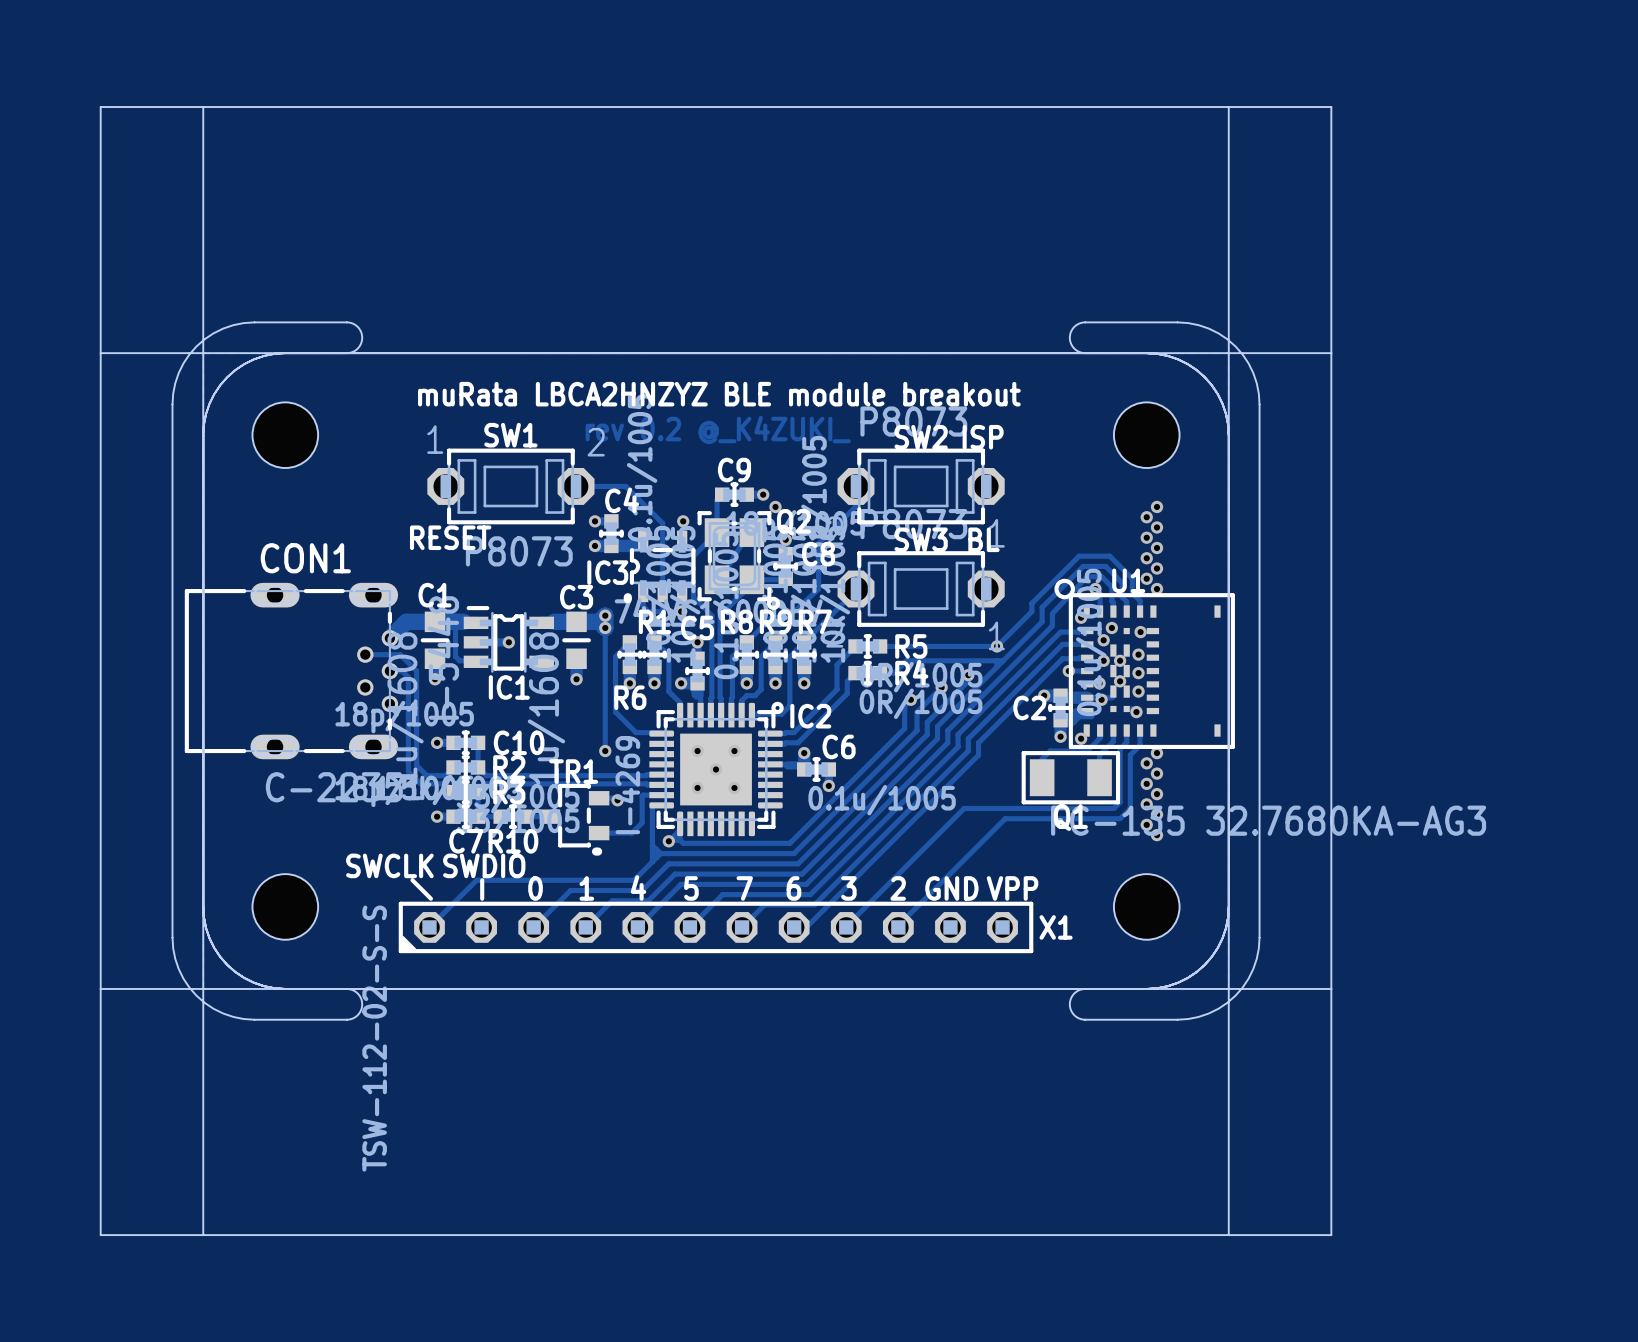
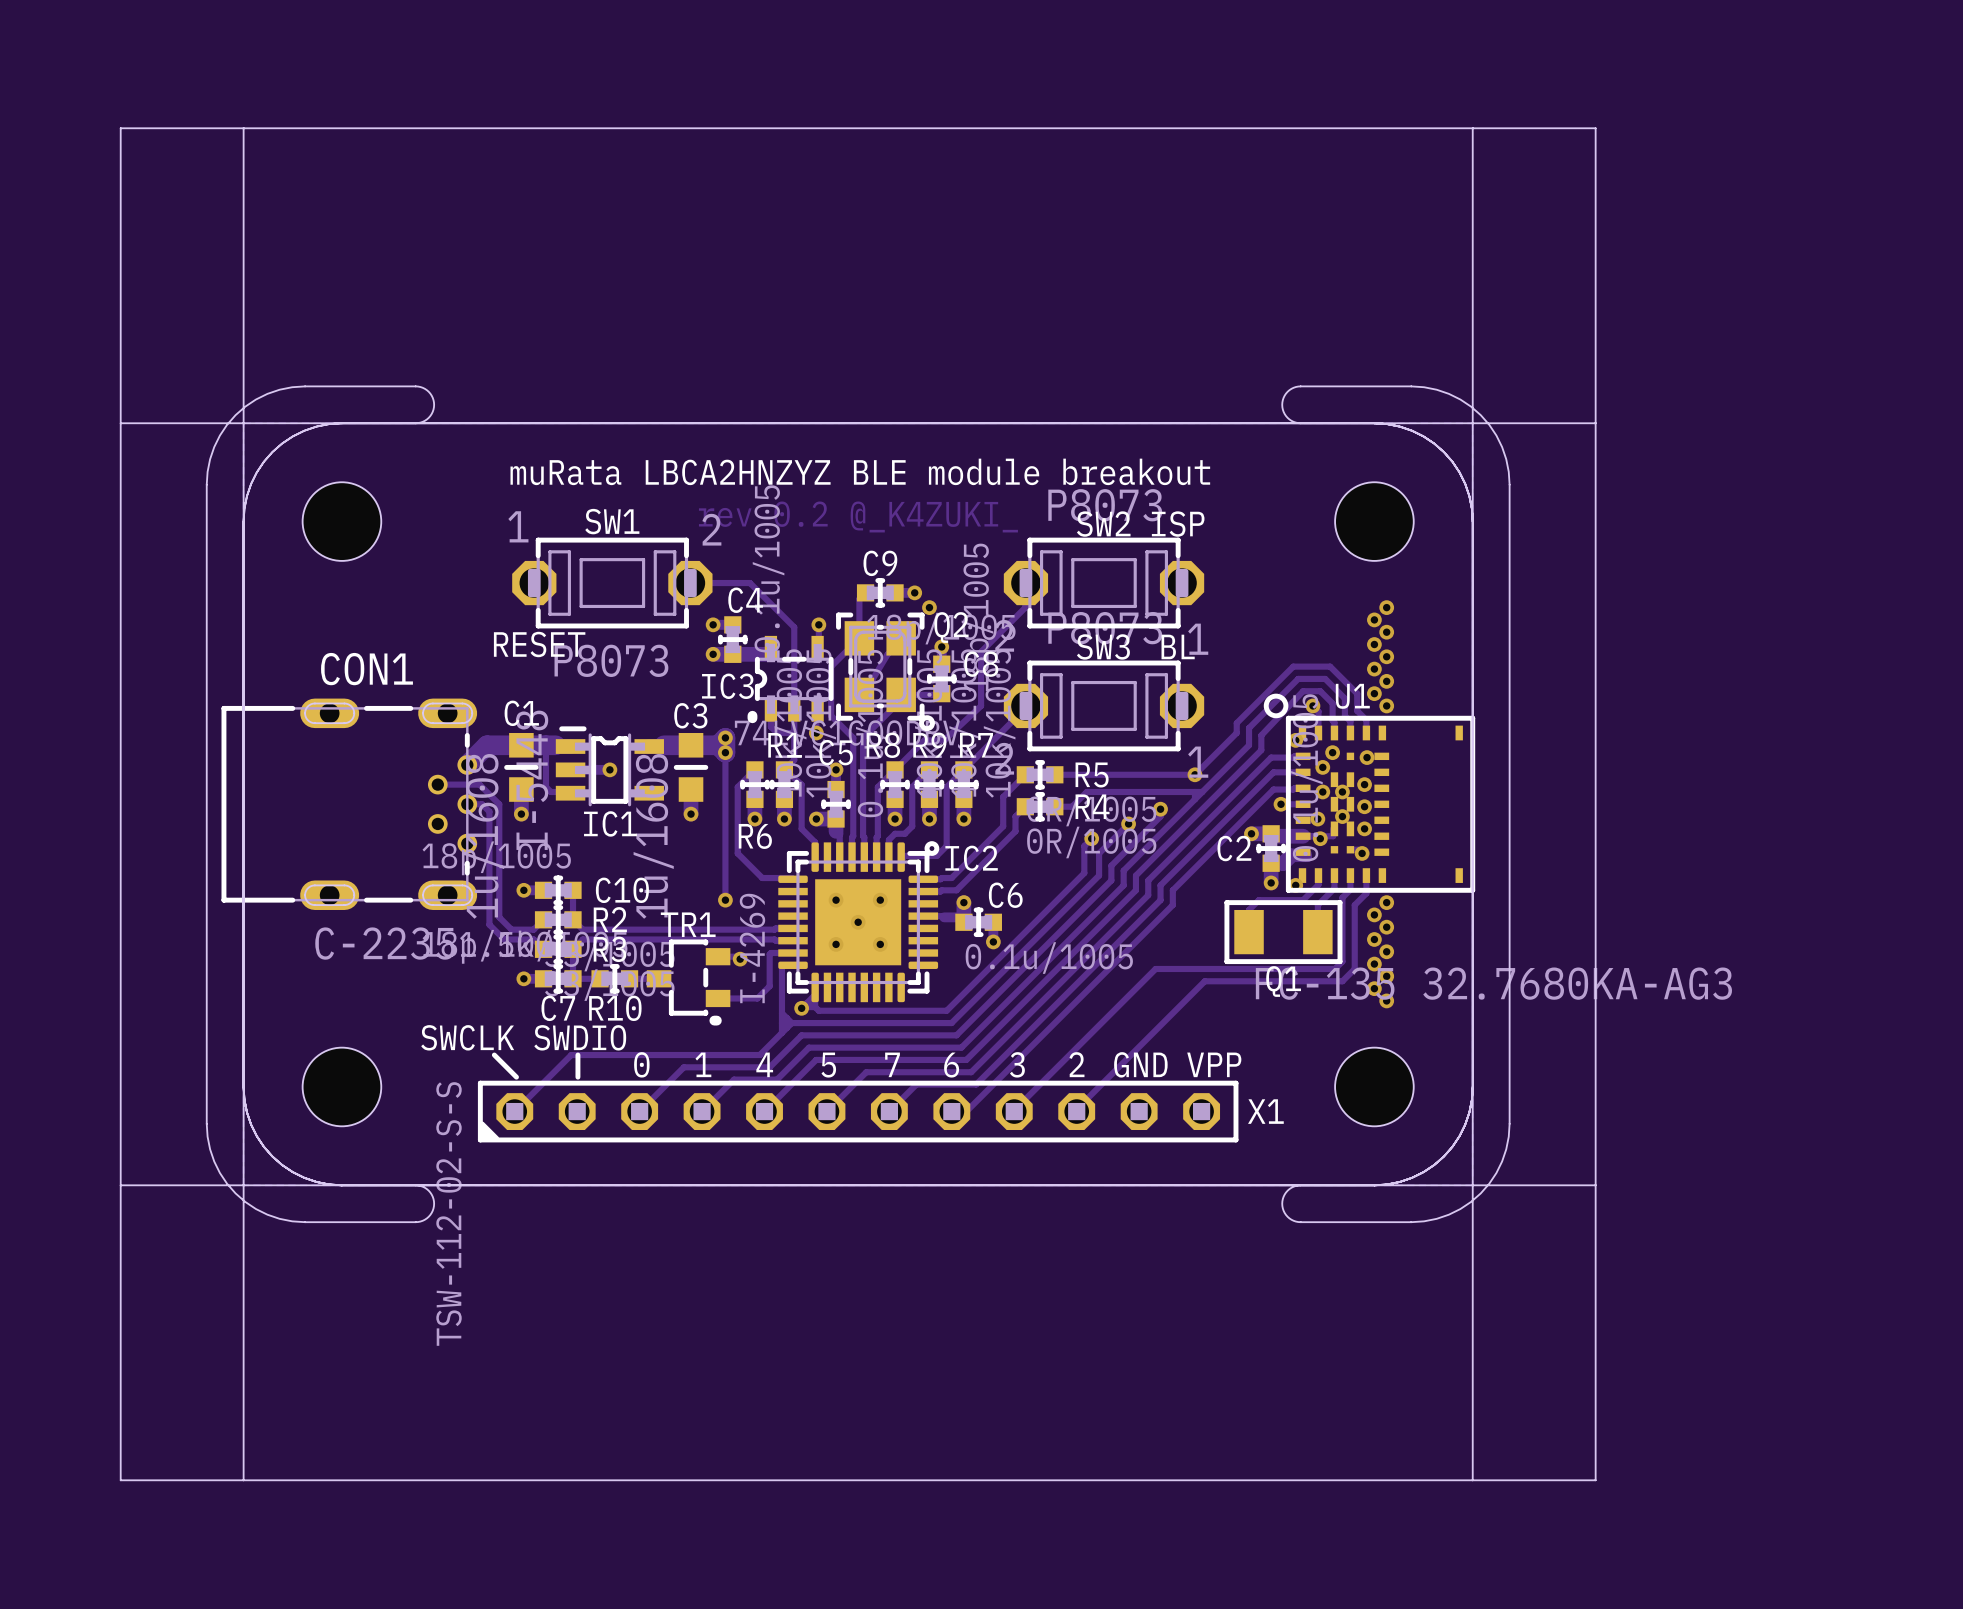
U1 footprint: [1054, 578, 1235, 749] -> [1263, 693, 1476, 893]

